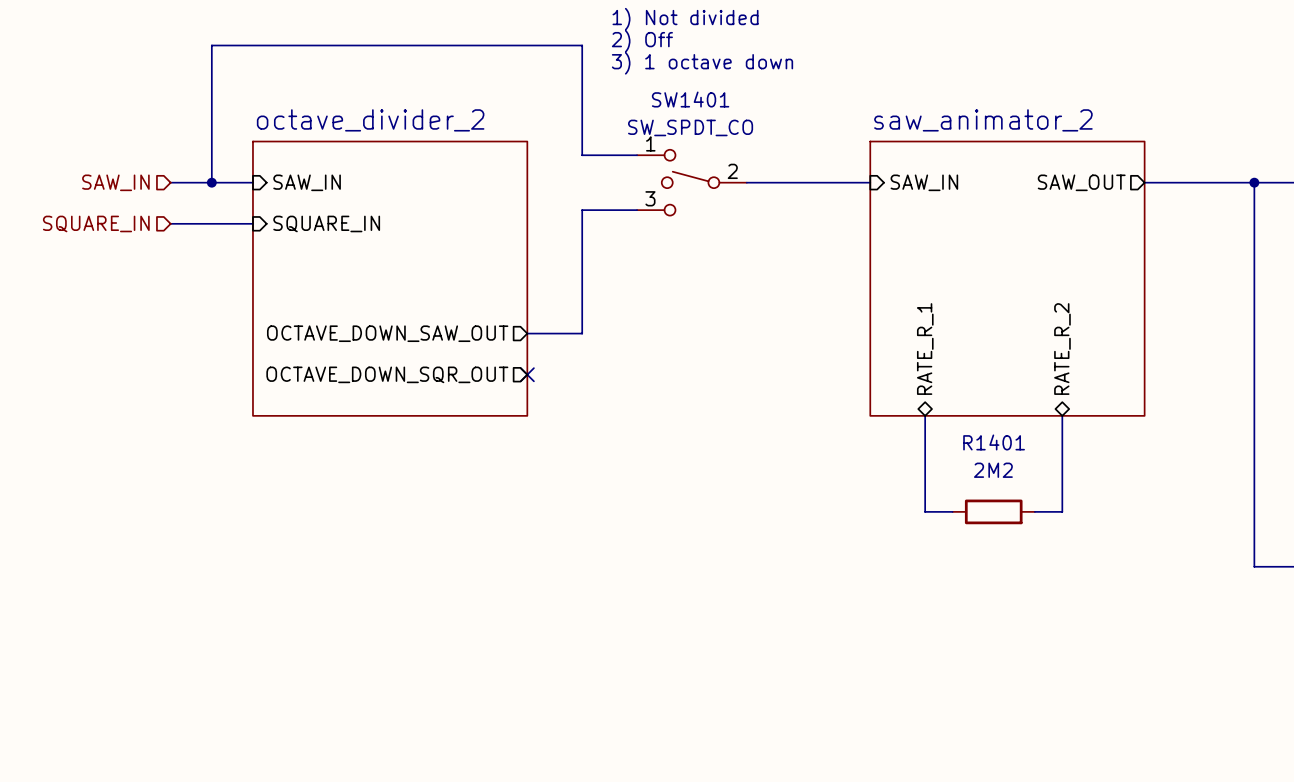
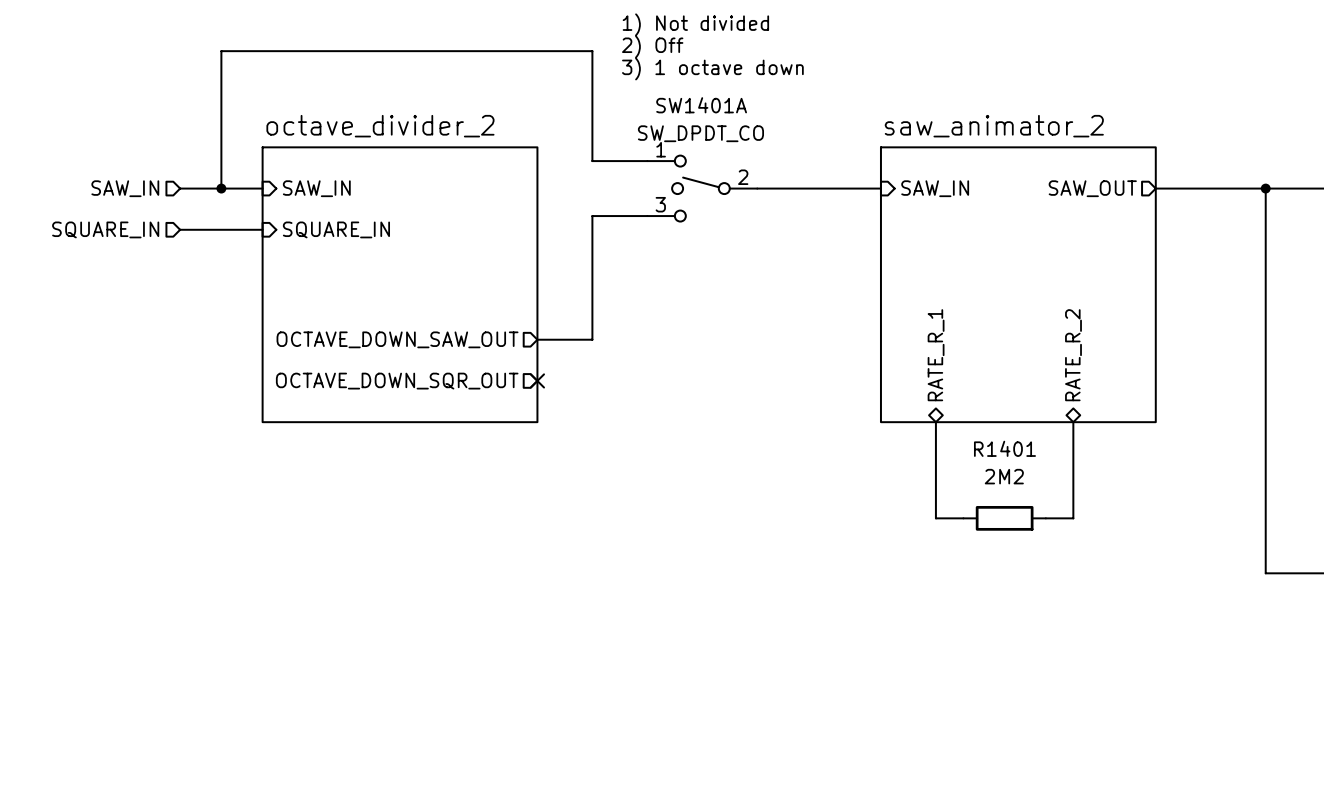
SW1401 name: SW1401 (690, 99) -> SW1401A (701, 105)
SW1401 value: SW_SPDT_CO (690, 127) -> SW_DPDT_CO (700, 133)

